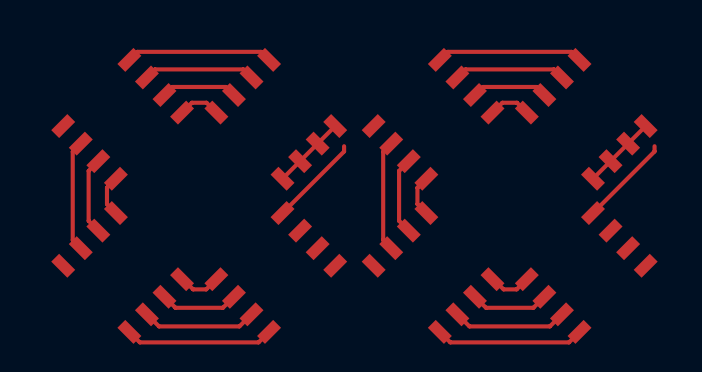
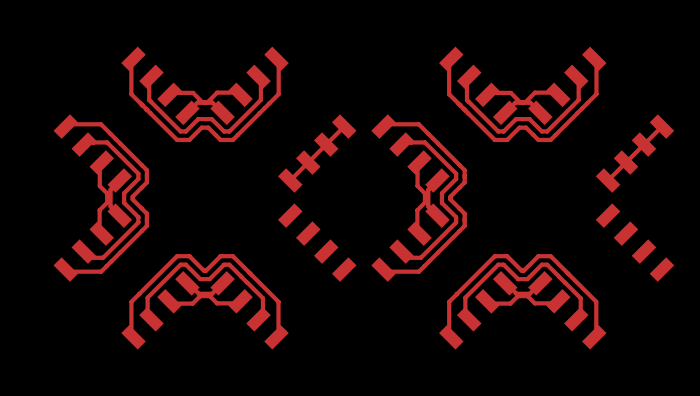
top track: (269, 59) (261, 51) (137, 51) (129, 59) -> (276, 58) (278, 61) (278, 94) (232, 139) (220, 139) (208, 127) (201, 127) (189, 139) (177, 139) (131, 94) (131, 61) (133, 58)
top track: (579, 59) (571, 51) (447, 51) (439, 59) -> (594, 58) (596, 61) (596, 94) (550, 139) (538, 139) (526, 127) (519, 127) (507, 139) (494, 139) (449, 94) (449, 61) (451, 58)
top track: (251, 77) (243, 69) (154, 69) (146, 77) -> (258, 76) (260, 79) (260, 99) (229, 131) (224, 131) (211, 119) (198, 119) (185, 131) (180, 131) (149, 100) (149, 79) (151, 76)
top track: (561, 77) (553, 69) (465, 69) (457, 77) -> (576, 76) (578, 79) (578, 99) (547, 131) (541, 131) (529, 119) (515, 119) (503, 131) (498, 131) (466, 100) (466, 79) (469, 76)
top track: (166, 93) (172, 86) (225, 86) (233, 95) -> (171, 92) (193, 92) (202, 102) (207, 102) (217, 92) (242, 92) (240, 94)
top track: (476, 93) (483, 86) (536, 86) (544, 95) -> (489, 92) (510, 92) (520, 102) (525, 102) (535, 92) (560, 92) (558, 94)
top track: none -> (65, 126) (68, 124) (101, 124) (146, 170) (146, 182) (132, 196) (132, 199) (146, 213) (146, 225) (101, 271) (74, 271)
top track: none -> (383, 126) (385, 124) (418, 124) (464, 170) (464, 182) (450, 196) (450, 199) (464, 213) (464, 225) (418, 271) (391, 271)
top track: (80, 143) (72, 151) (72, 240) (80, 248) -> (93, 142) (107, 142) (138, 173) (138, 178) (124, 193) (124, 202) (138, 217) (138, 222) (103, 257) (89, 257) (83, 251)
top track: (391, 143) (383, 151) (383, 240) (391, 248) -> (411, 142) (424, 142) (456, 173) (456, 178) (441, 193) (441, 202) (456, 217) (456, 222) (420, 257) (407, 257) (401, 251)
top track: (344, 146) (344, 151) (282, 213) -> none
top track: (654, 146) (654, 151) (592, 213) -> none
top track: (96, 163) (88, 170) (88, 220) (96, 228) -> (99, 164) (99, 186) (107, 193) (107, 202) (99, 210) (99, 231)
top track: (406, 163) (399, 170) (399, 220) (406, 228) -> (417, 164) (417, 186) (424, 193) (424, 202) (417, 210) (417, 231)
top track: none -> (241, 276) (247, 282)
top track: none -> (247, 282) (262, 298) (262, 314) (258, 319)
top track: (233, 296) (222, 307) (175, 307) (166, 298) -> (240, 301) (242, 303) (217, 303) (209, 296) (200, 296) (192, 303) (171, 303)
top track: (544, 296) (533, 307) (485, 307) (477, 298) -> (558, 301) (560, 303) (534, 303) (527, 296) (517, 296) (510, 303) (489, 303)
top track: (251, 314) (239, 326) (159, 326) (146, 314) -> (241, 276) (229, 264) (224, 264) (209, 279) (200, 279) (185, 264) (180, 264) (147, 297) (147, 314) (151, 319)
top track: (561, 314) (549, 326) (469, 326) (457, 314) -> (576, 319) (580, 314) (580, 298) (547, 264) (541, 264) (527, 279) (518, 279) (503, 264) (498, 264) (465, 297) (465, 314) (469, 319)
top track: (269, 331) (258, 342) (139, 342) (129, 331) -> (276, 337) (278, 335) (278, 301) (232, 256) (220, 256) (206, 270) (189, 256) (177, 256) (131, 301) (129, 332) (133, 337)
top track: (579, 331) (569, 342) (450, 342) (439, 331) -> (594, 337) (596, 335) (596, 301) (550, 256) (538, 256) (523, 270) (507, 256) (494, 256) (449, 301) (447, 332) (451, 337)

